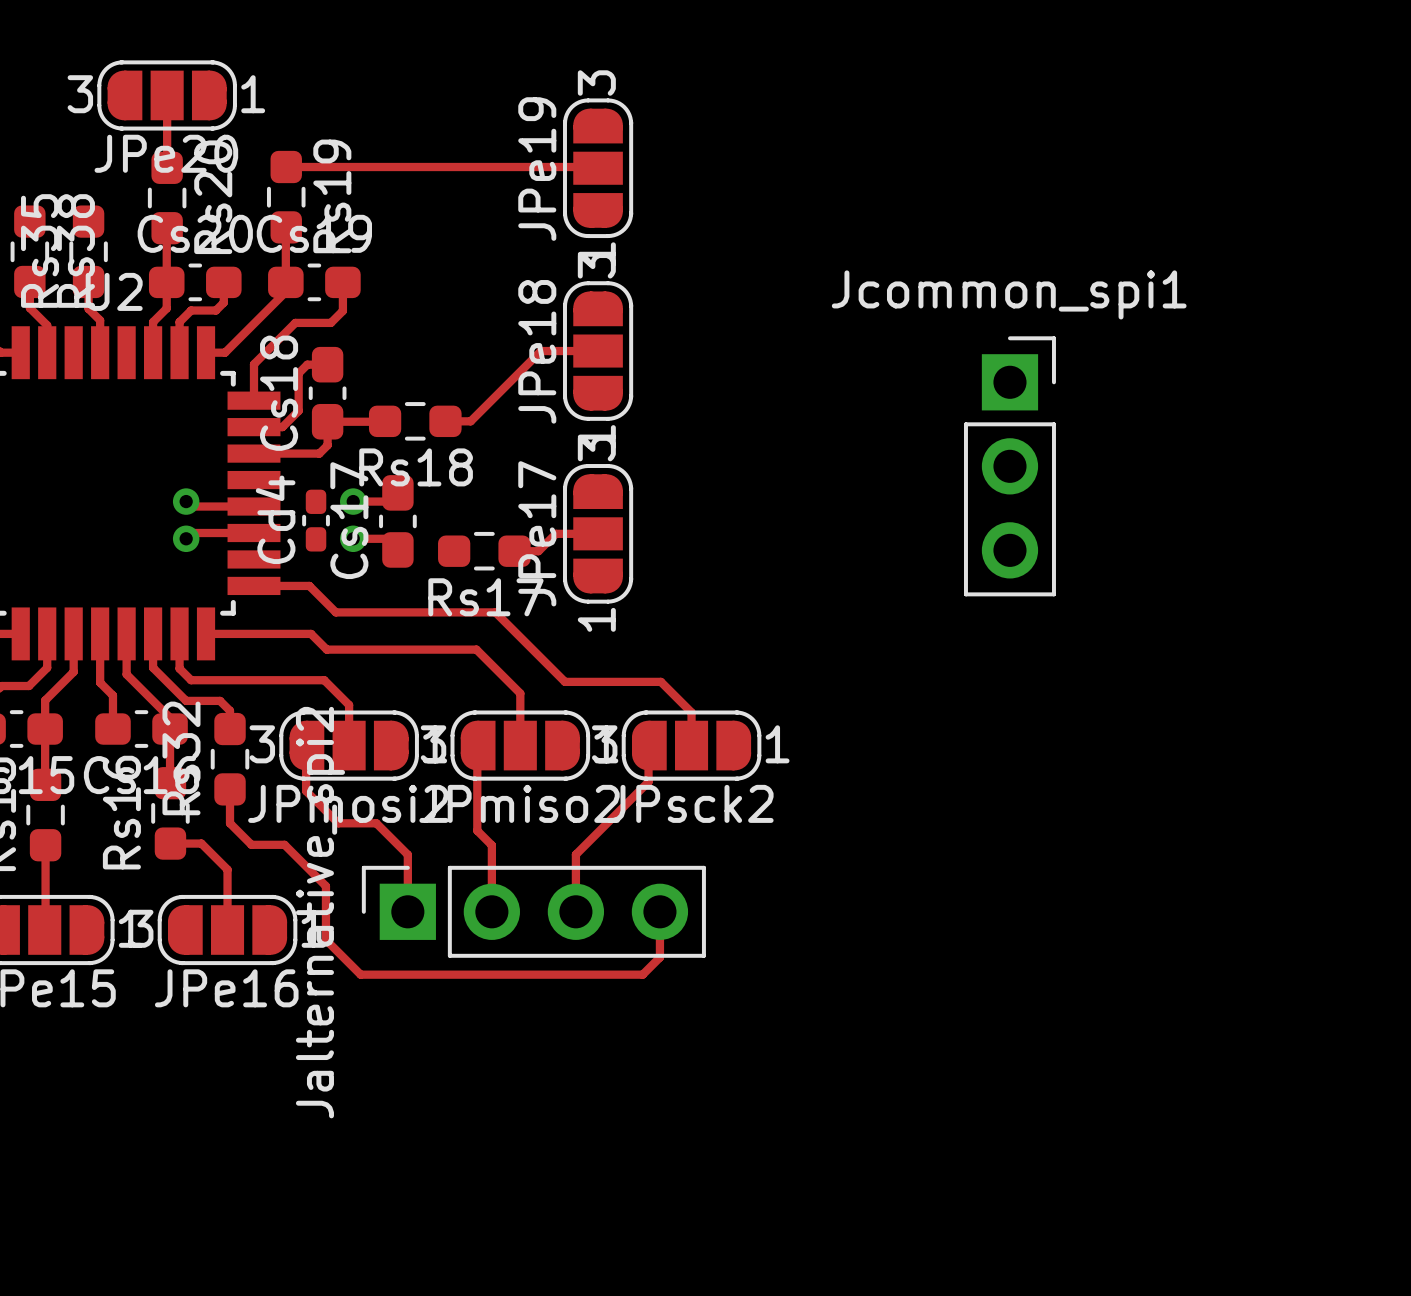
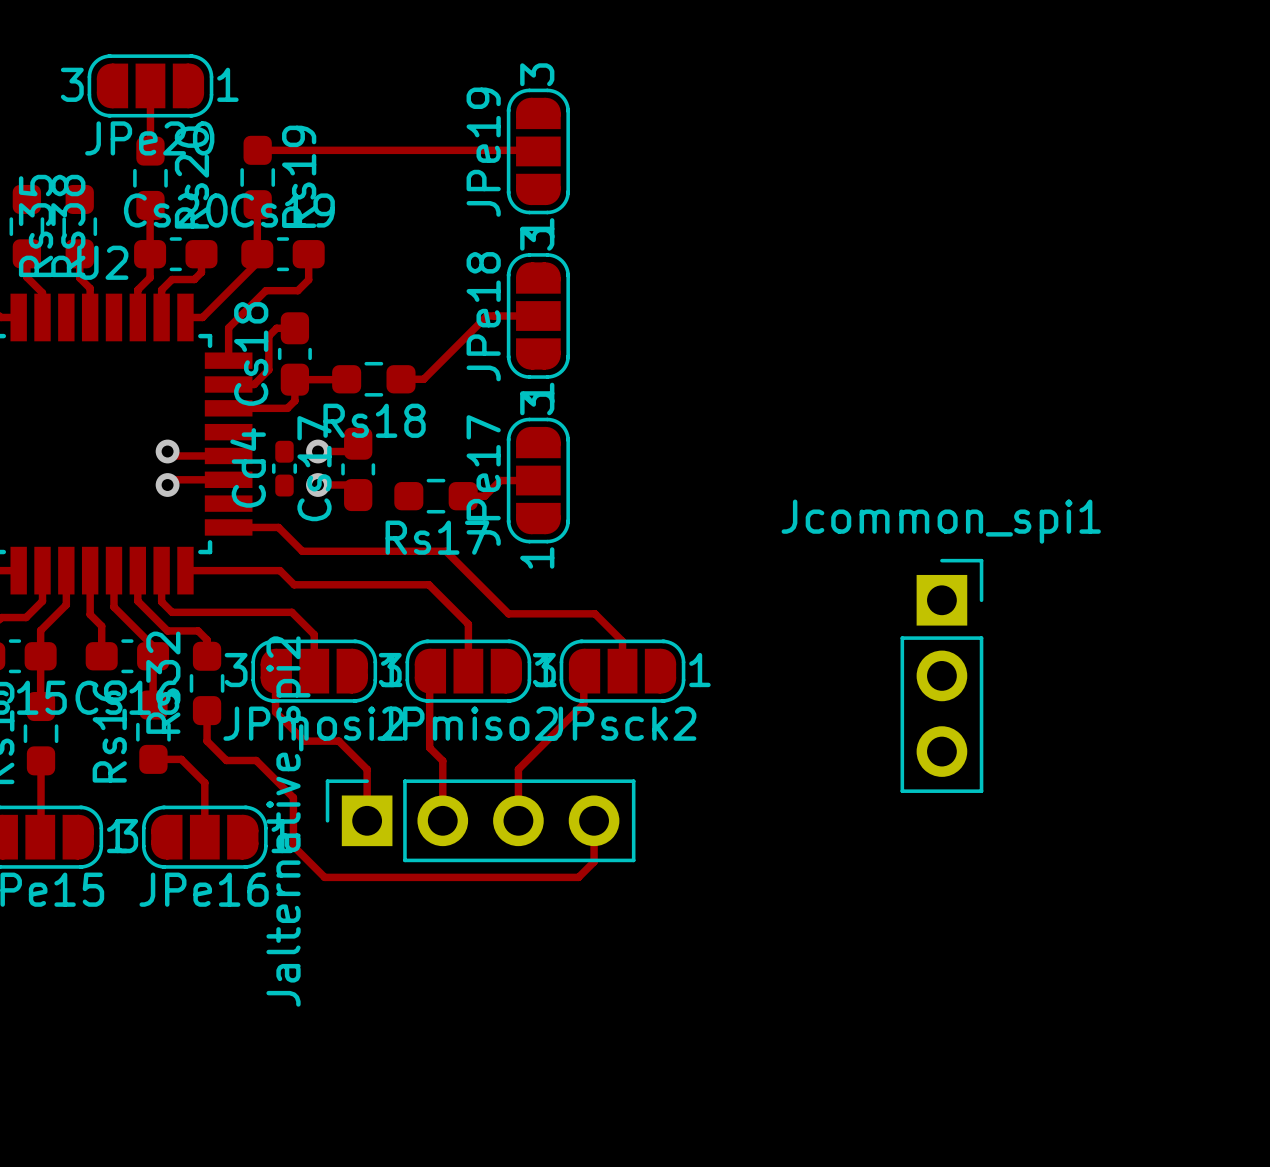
Jcommon_spi1 position: (1009, 466) -> (941, 675)

